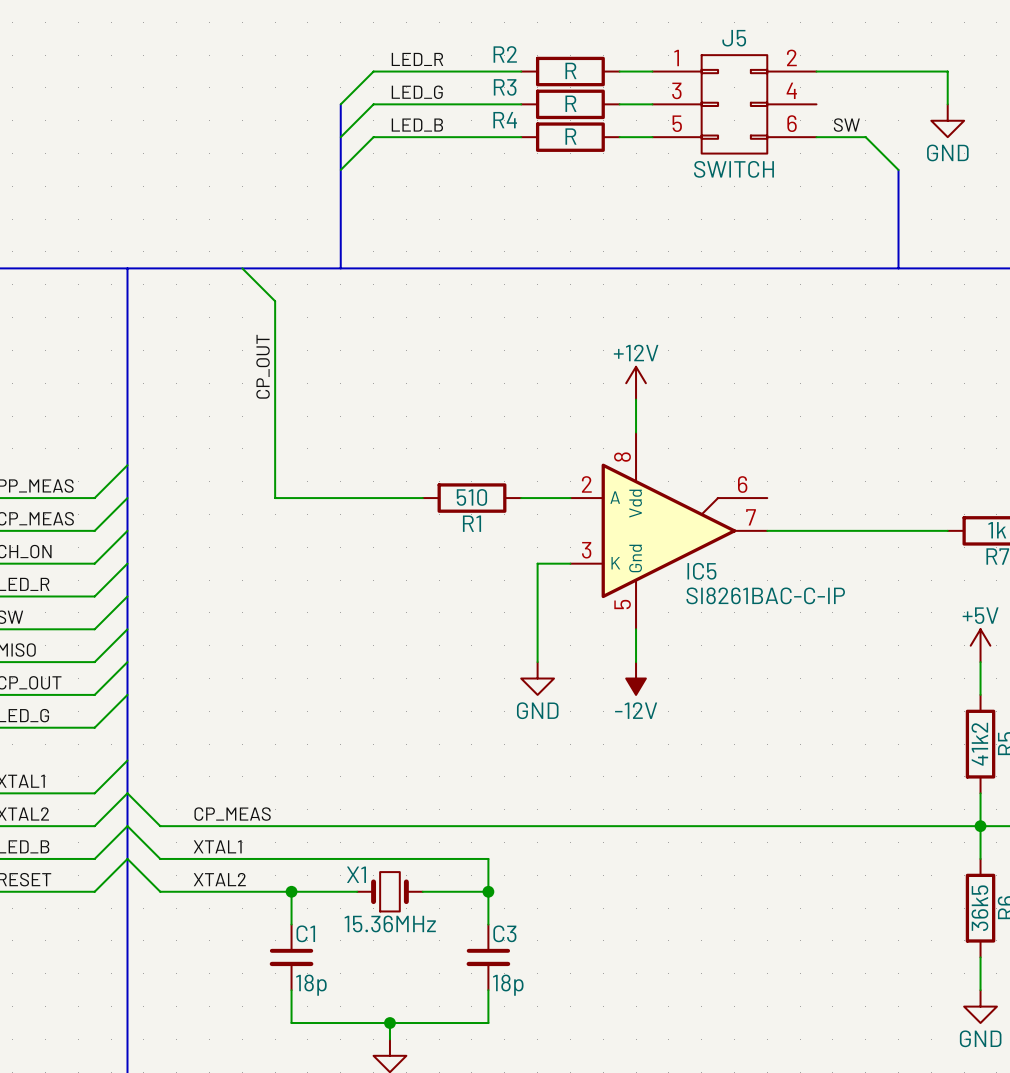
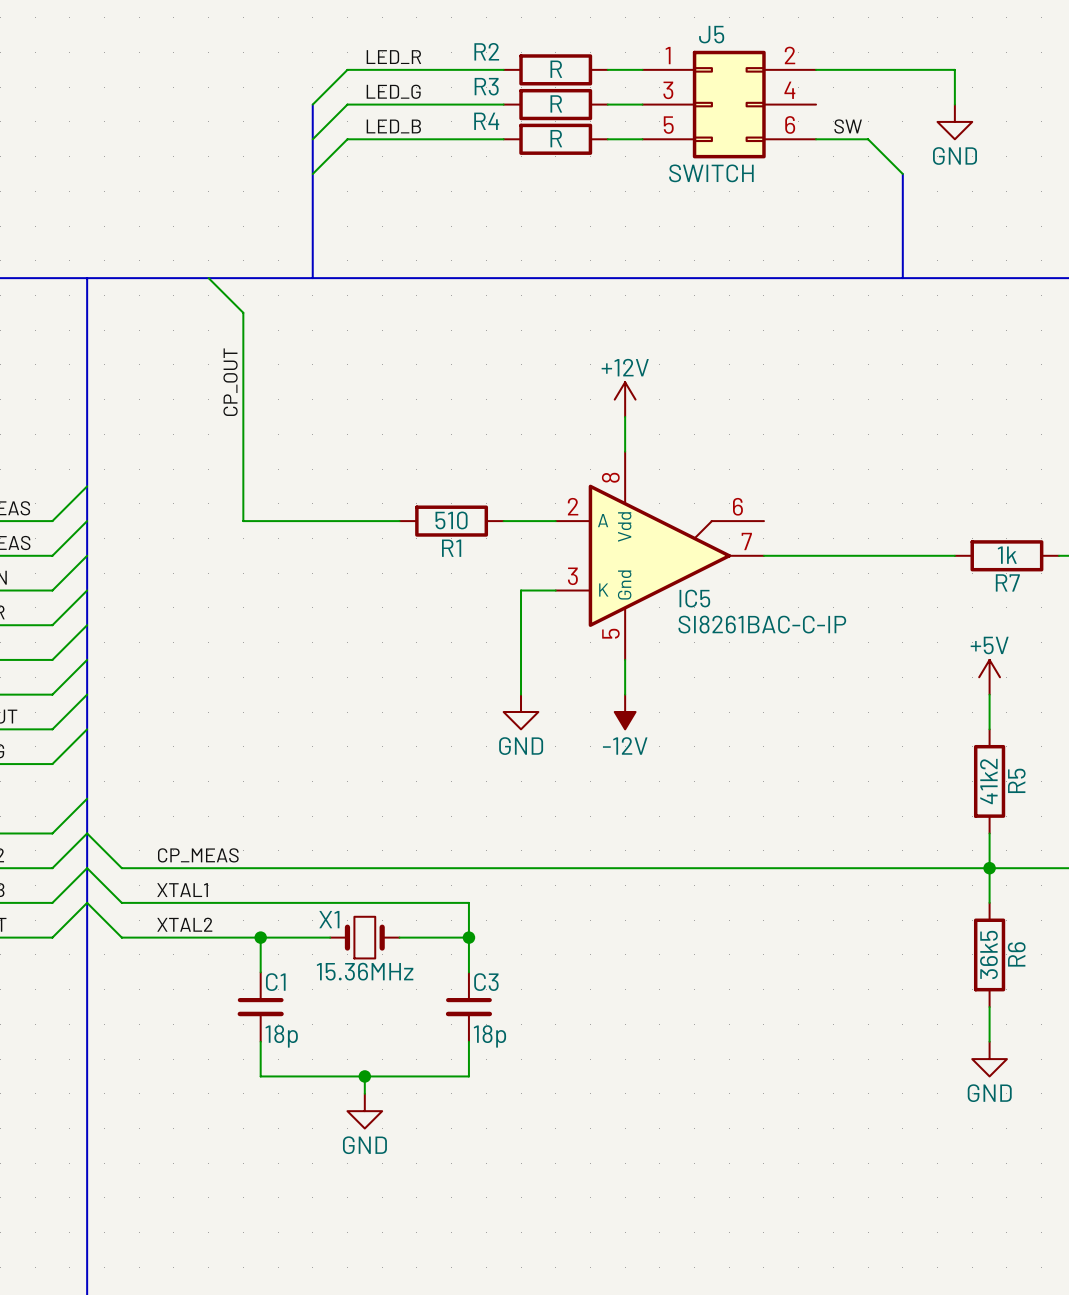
J5 symbol: [652, 55, 817, 154] -> [642, 50, 817, 159]

